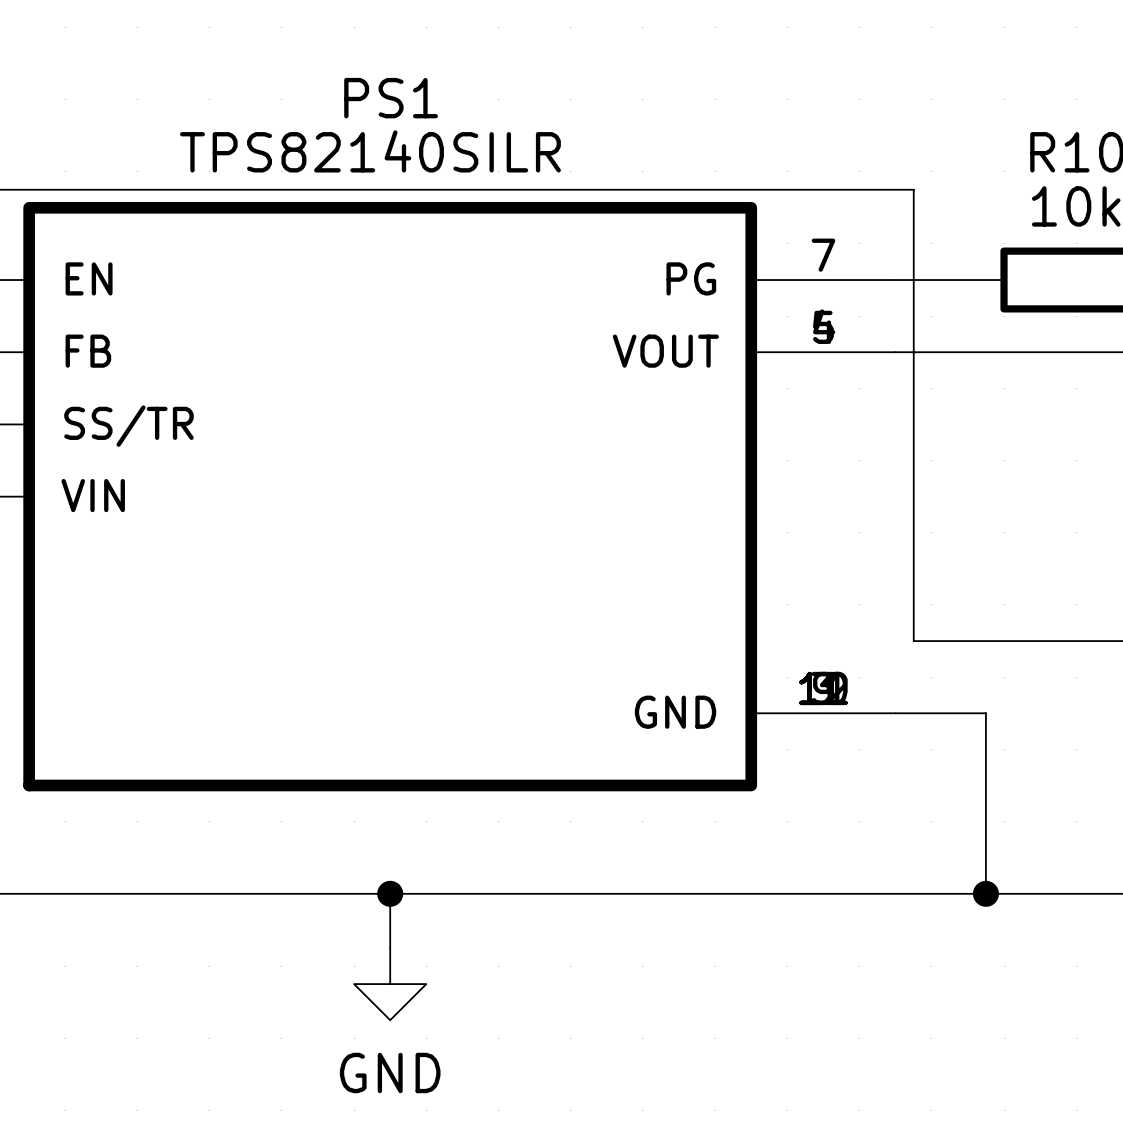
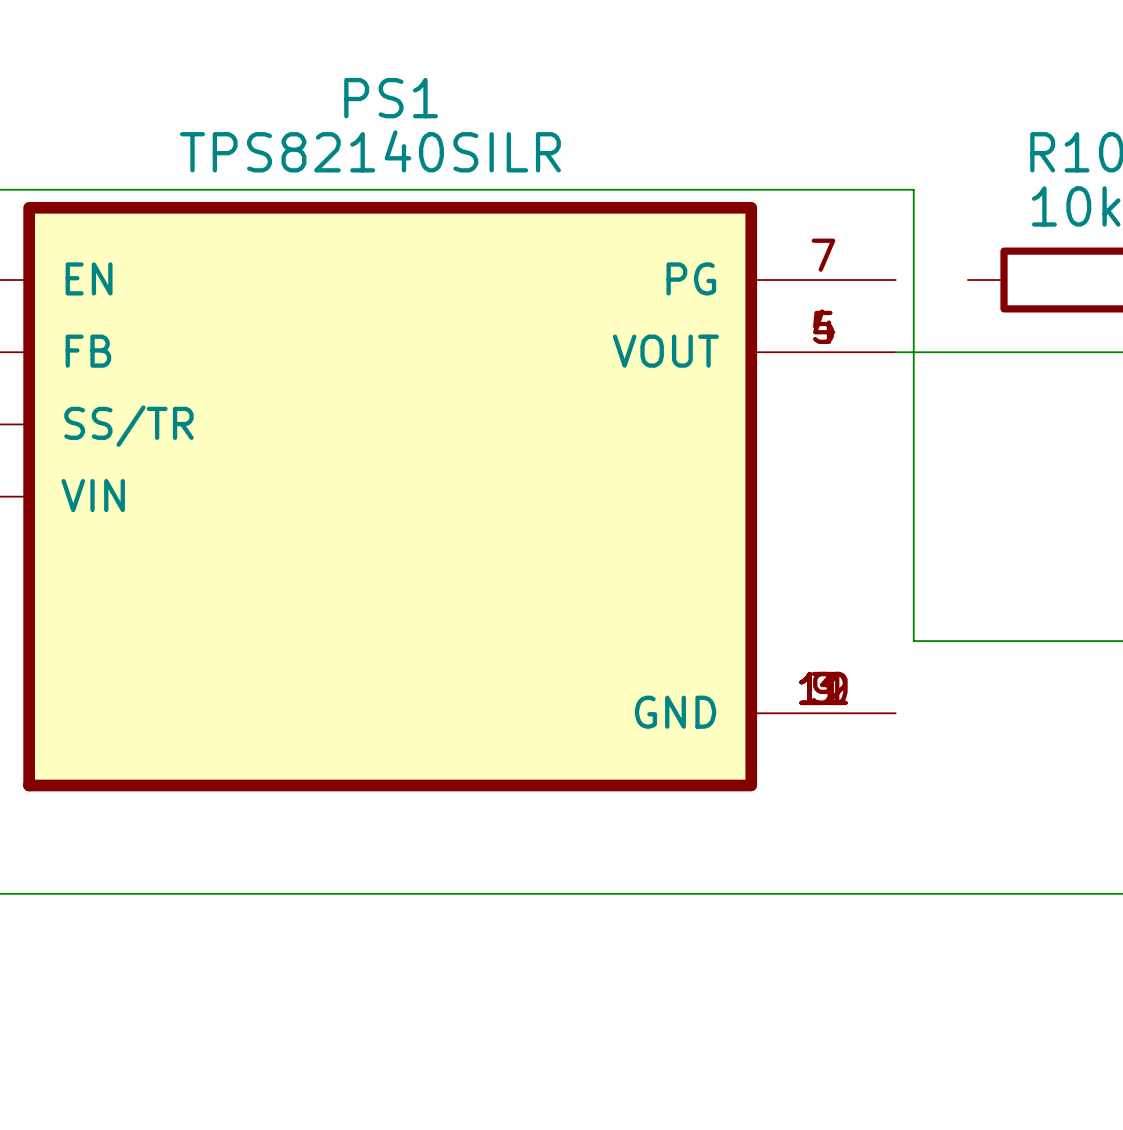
wire: (895, 280) (967, 280) -> none
wire: (895, 713) (985, 713) (985, 893) -> none
wire: (390, 893) (390, 947) -> none
junction: (390, 893) -> none
junction: (985, 893) -> none
power symbol: GND (390, 984) -> none

